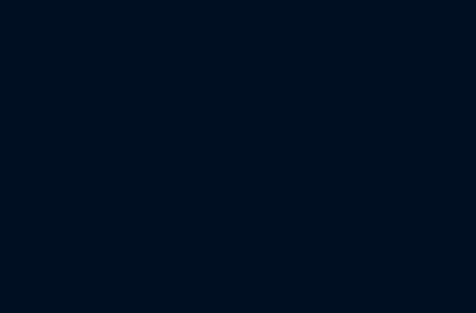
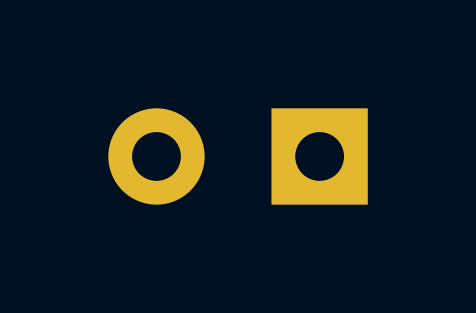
part: none -> (238, 156)

